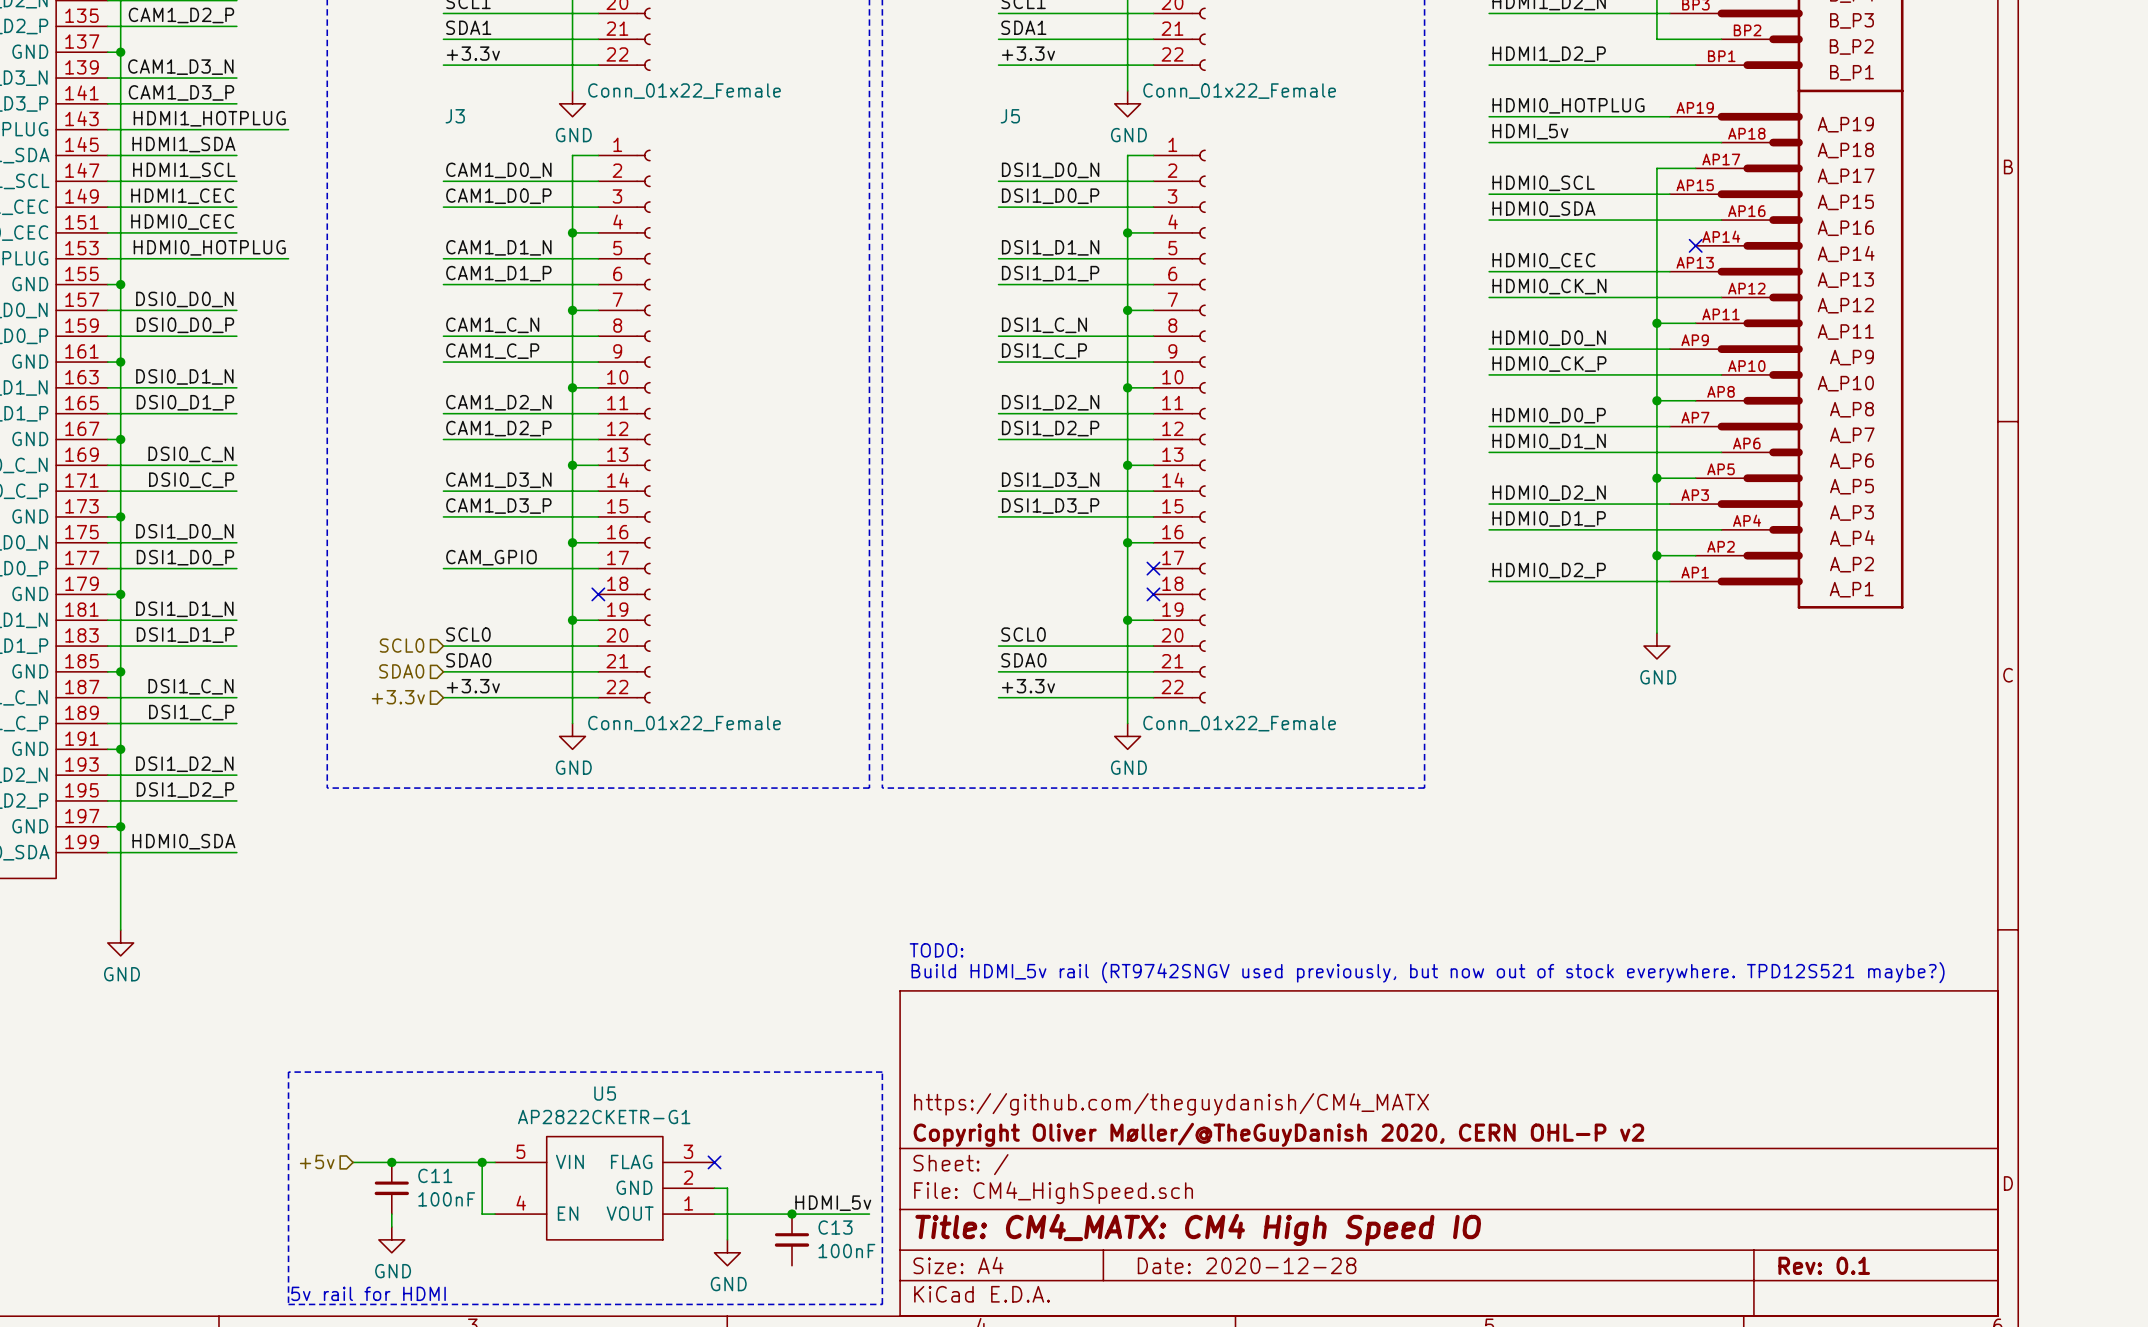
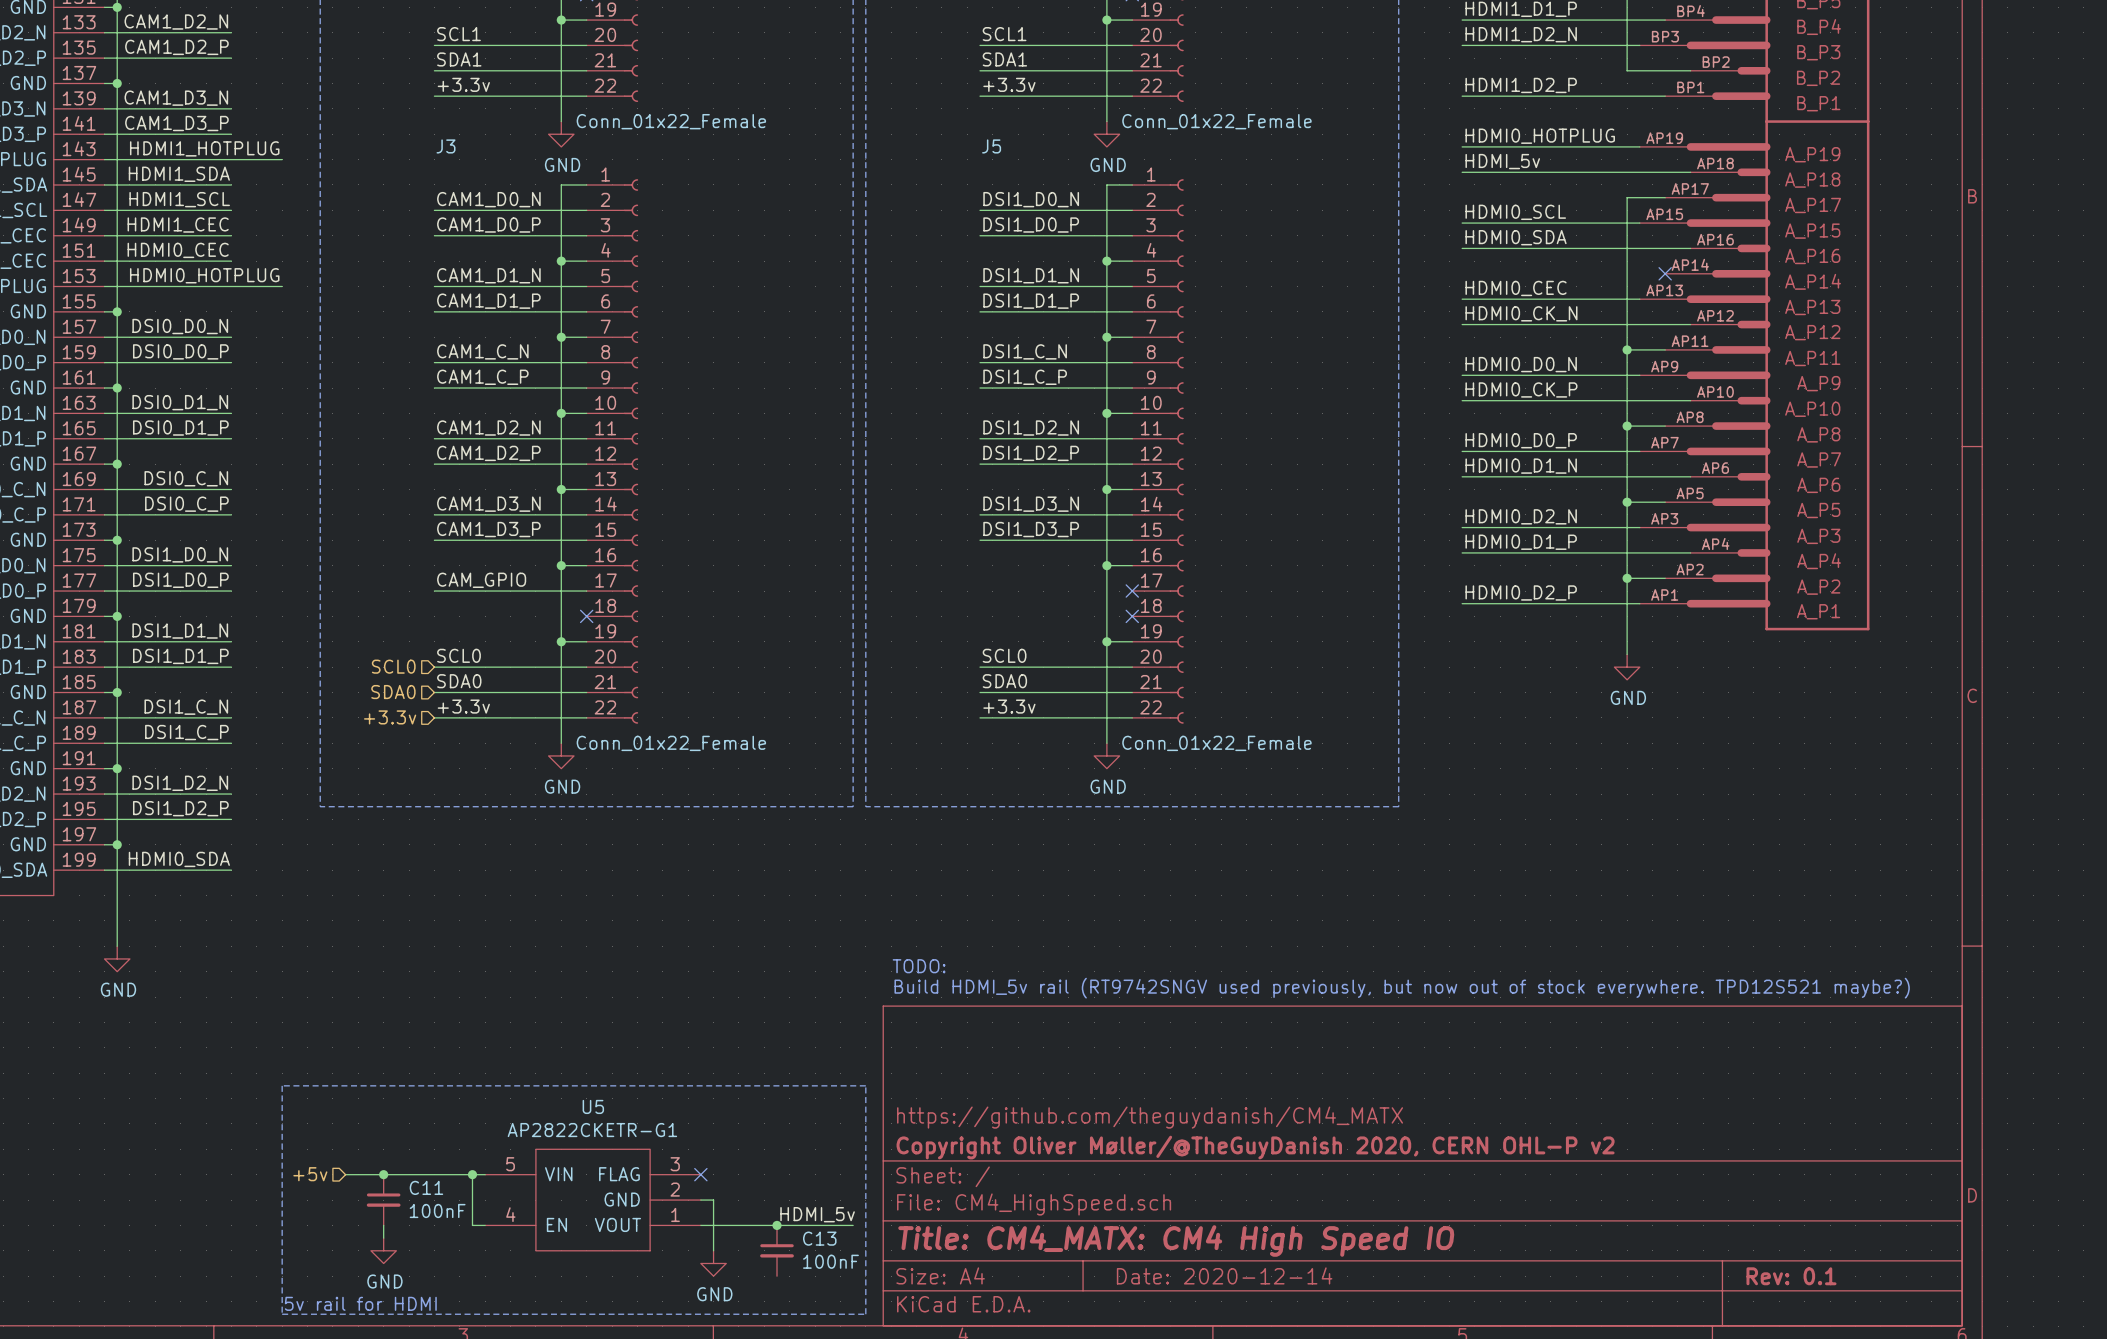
title block: Date: 2020-12-28 (1247, 1265) -> Date: 2020-12-14 (1224, 1275)

